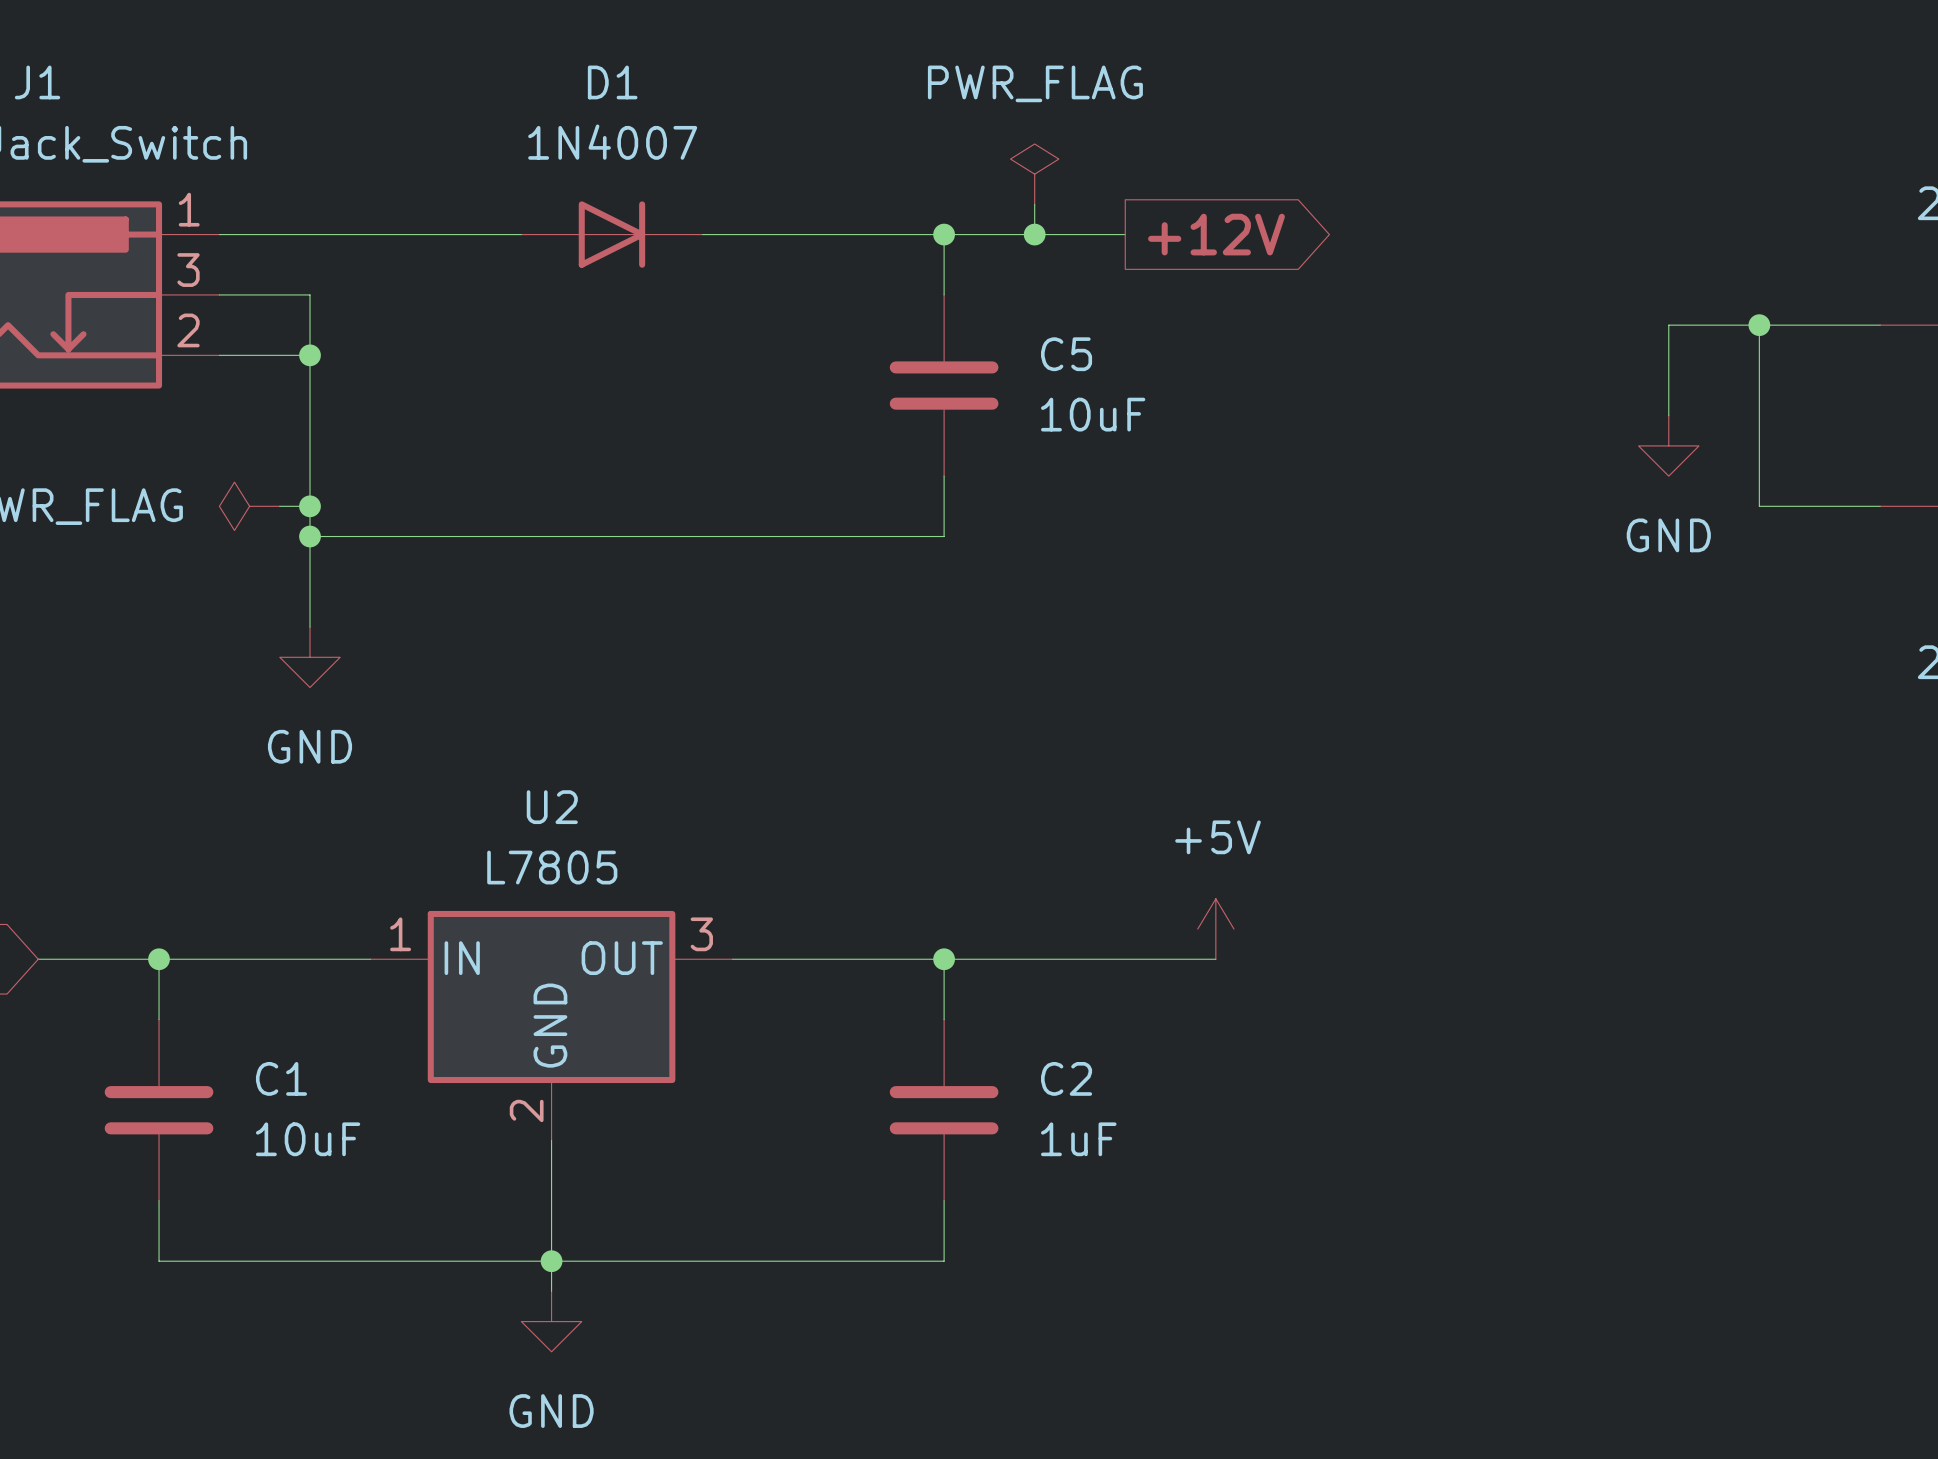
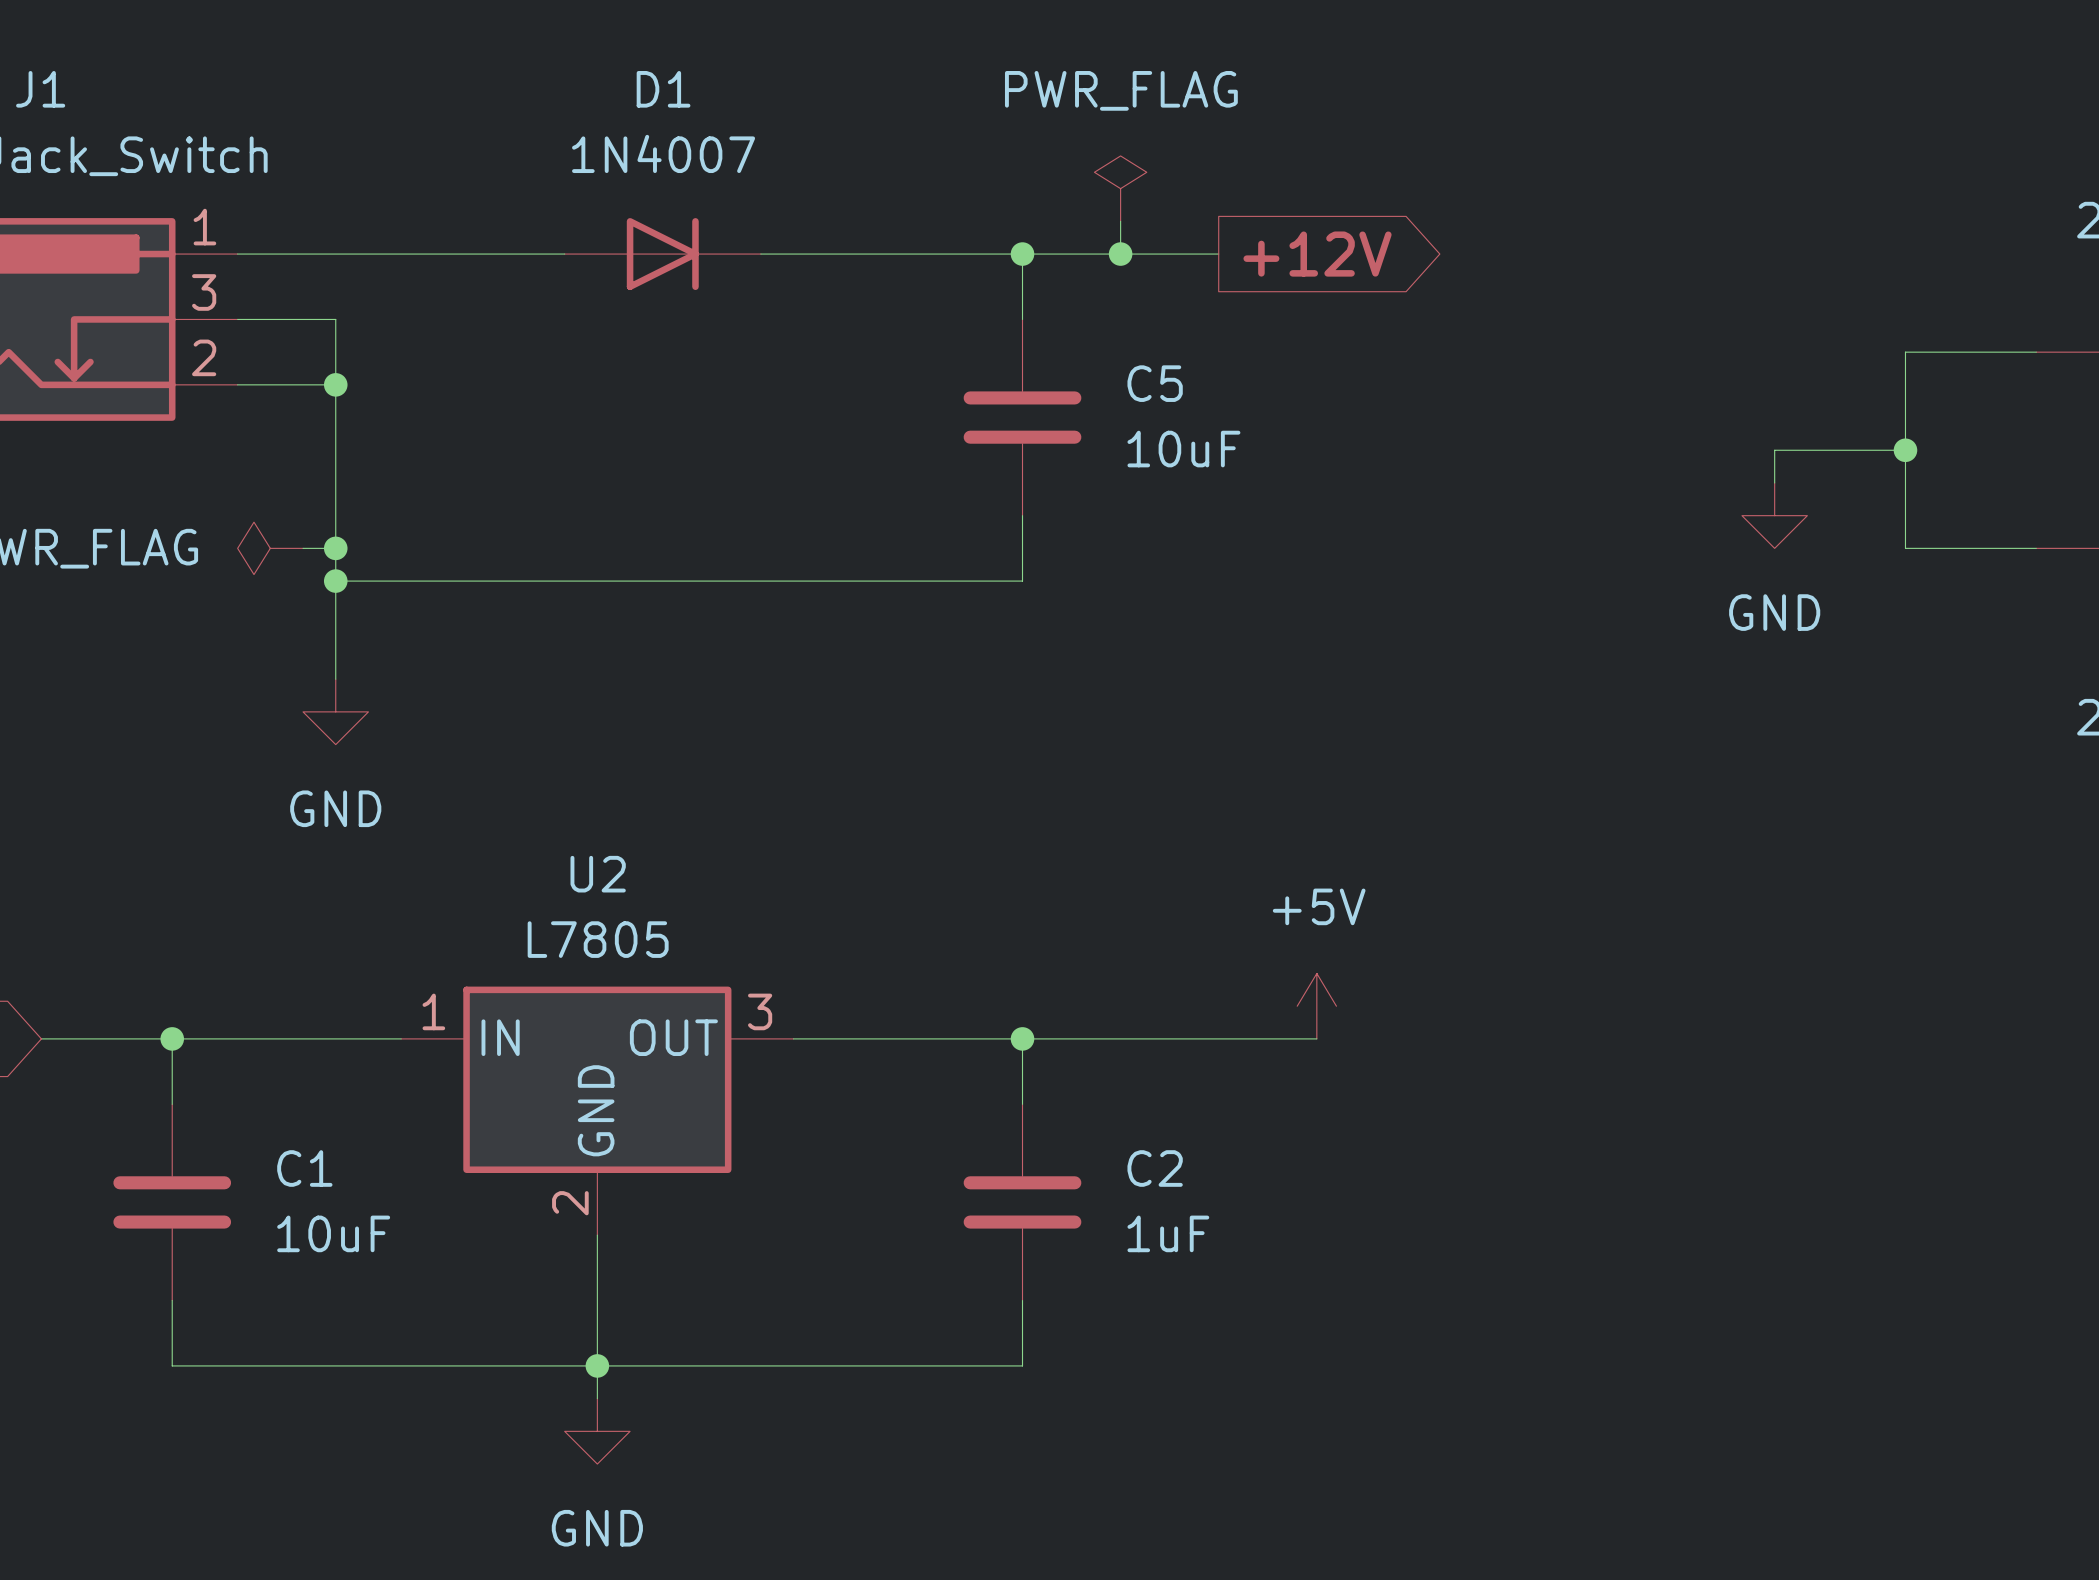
wire: (1759, 325) (1668, 325) (1668, 415) -> none
junction position: (1759, 325) -> (1905, 450)
wire: none -> (1905, 450) (1774, 450) (1774, 482)
power symbol position: GND (1668, 445) -> GND (1774, 515)

